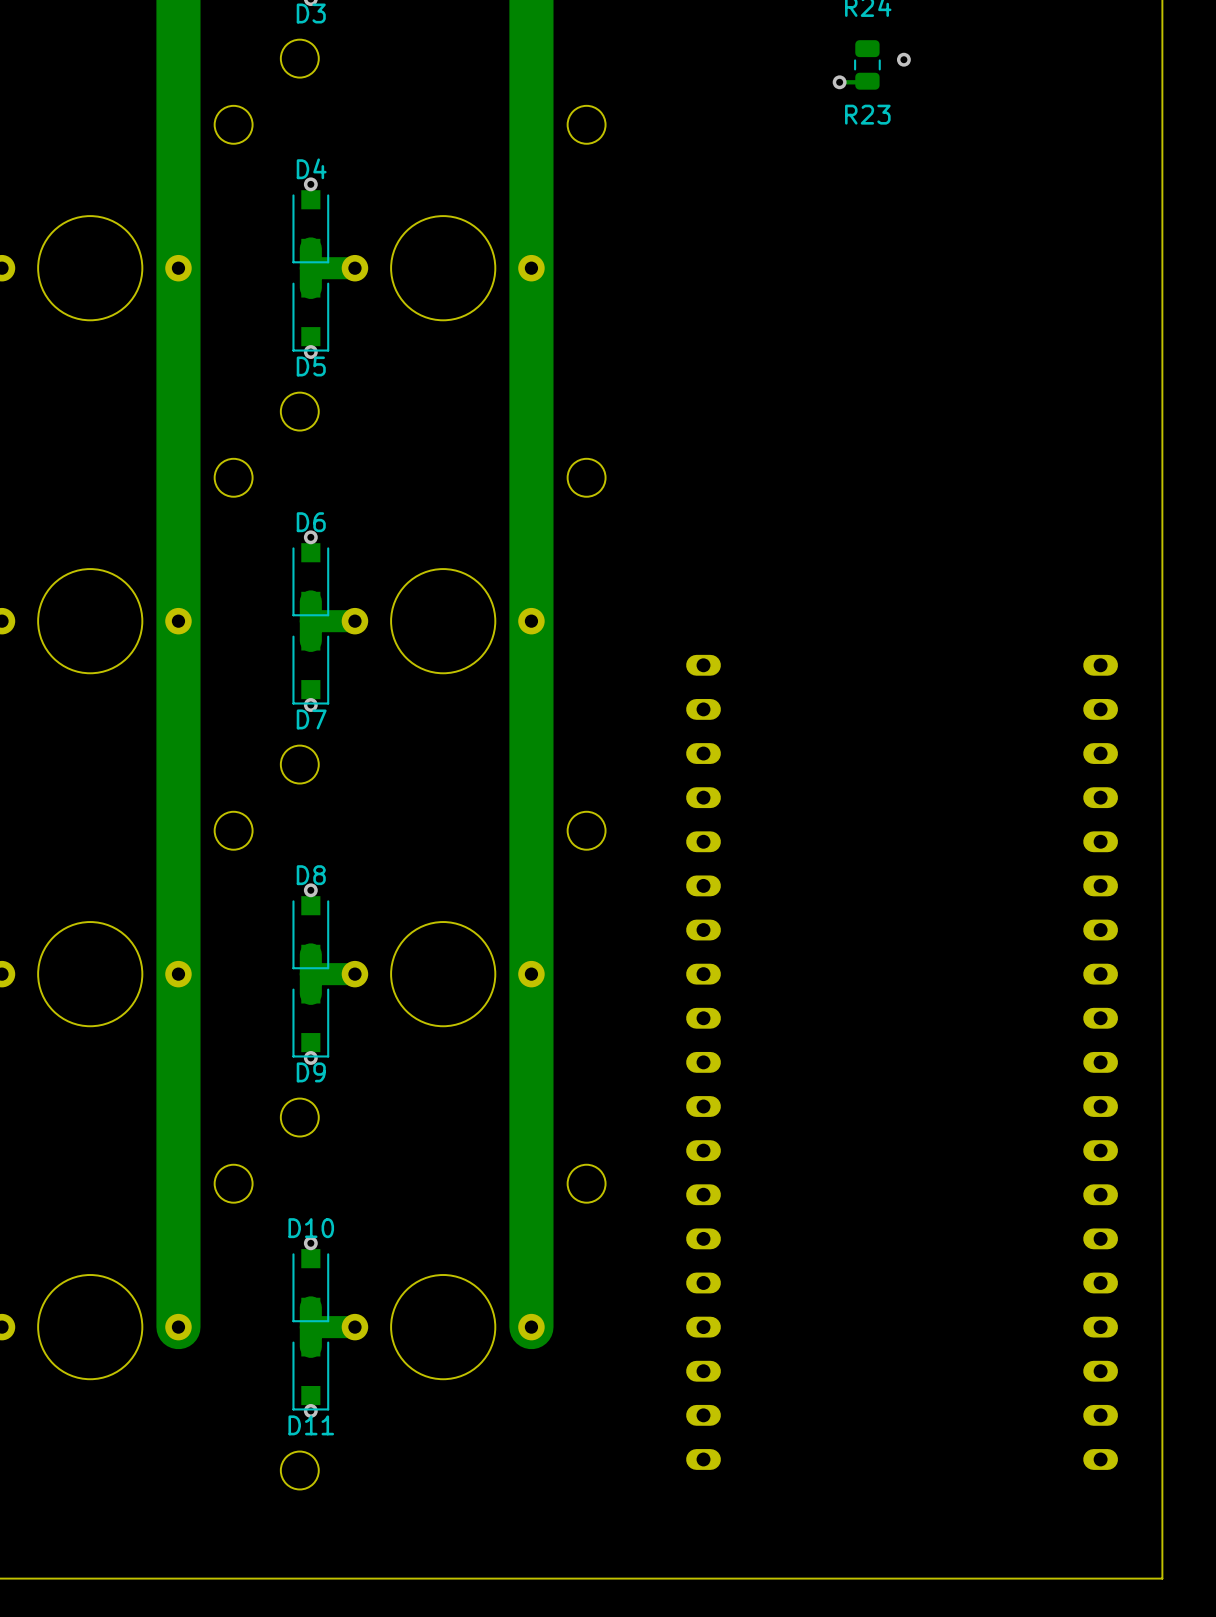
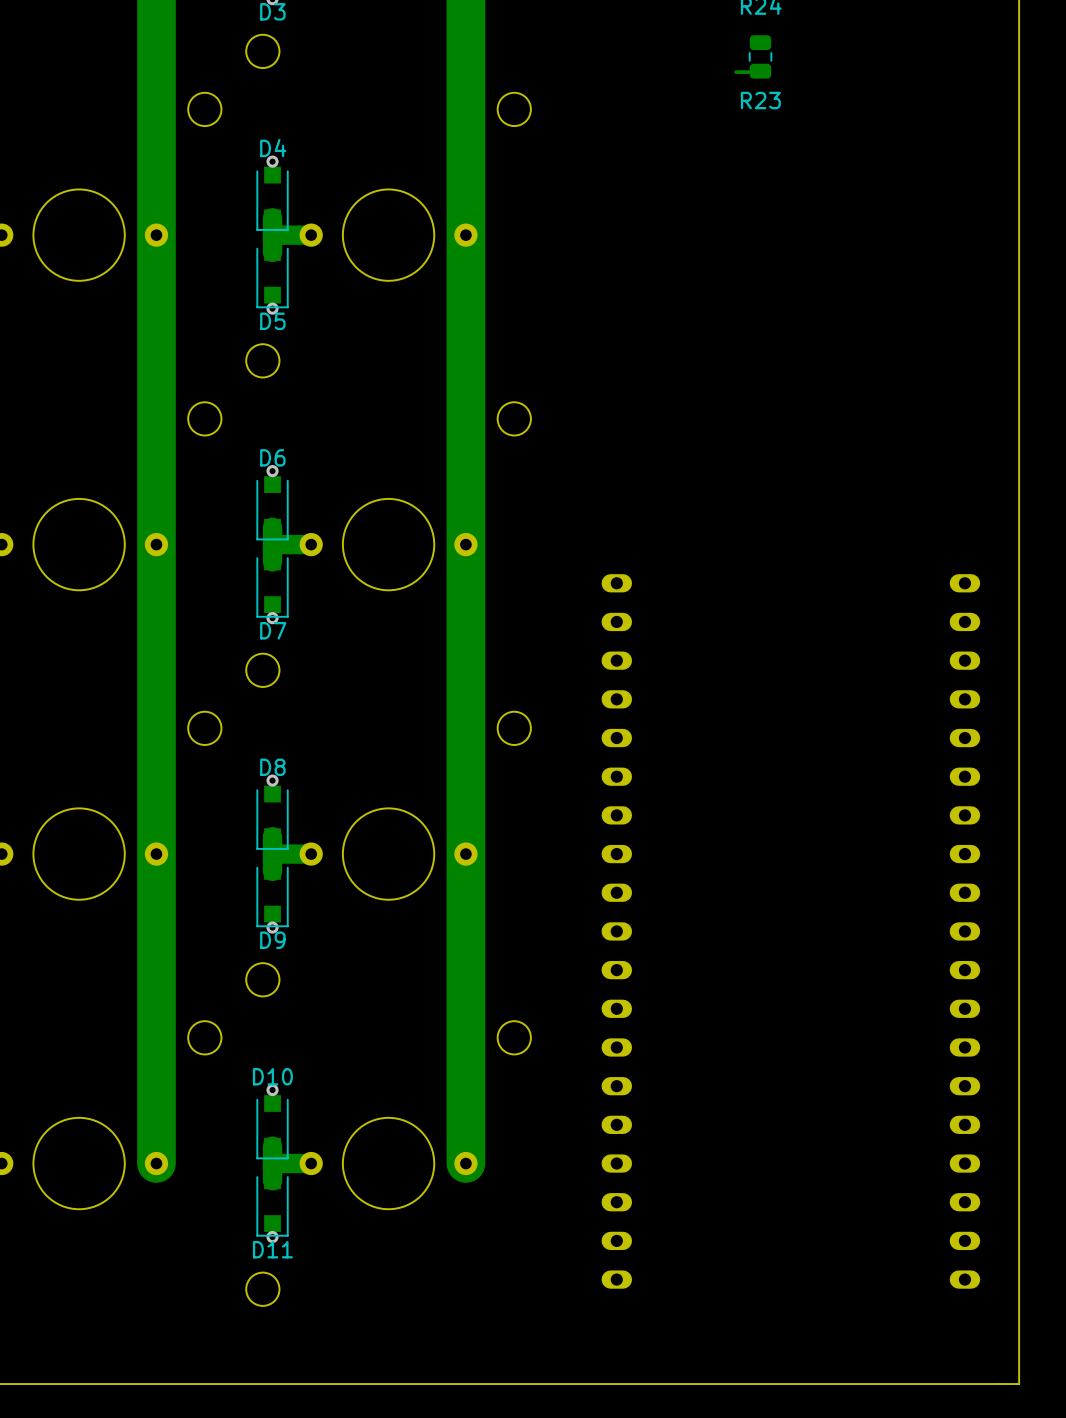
via: (903, 59) -> none
via: (839, 82) -> none

